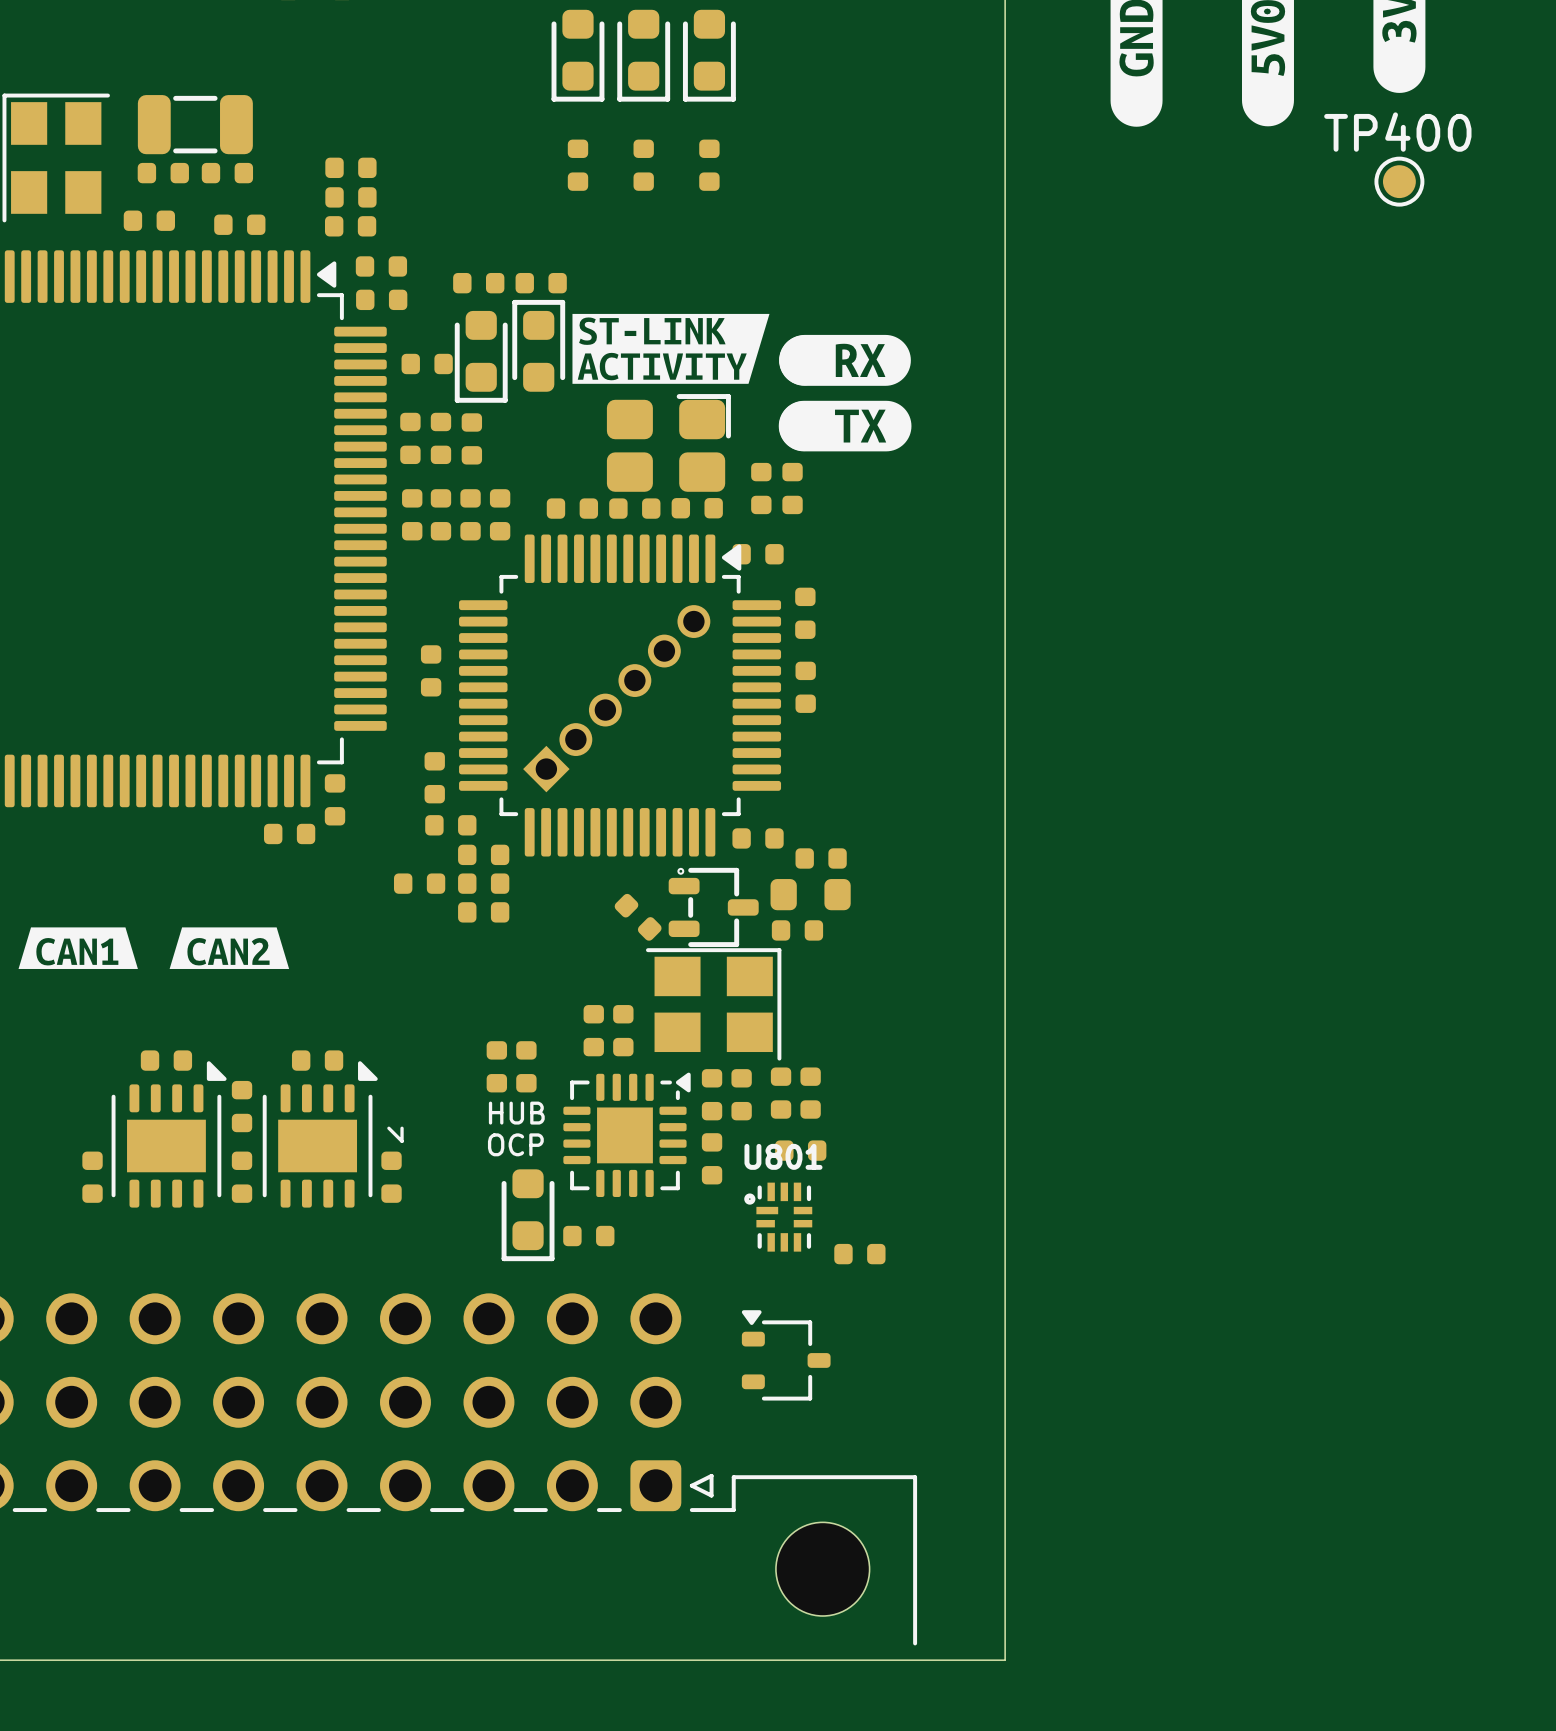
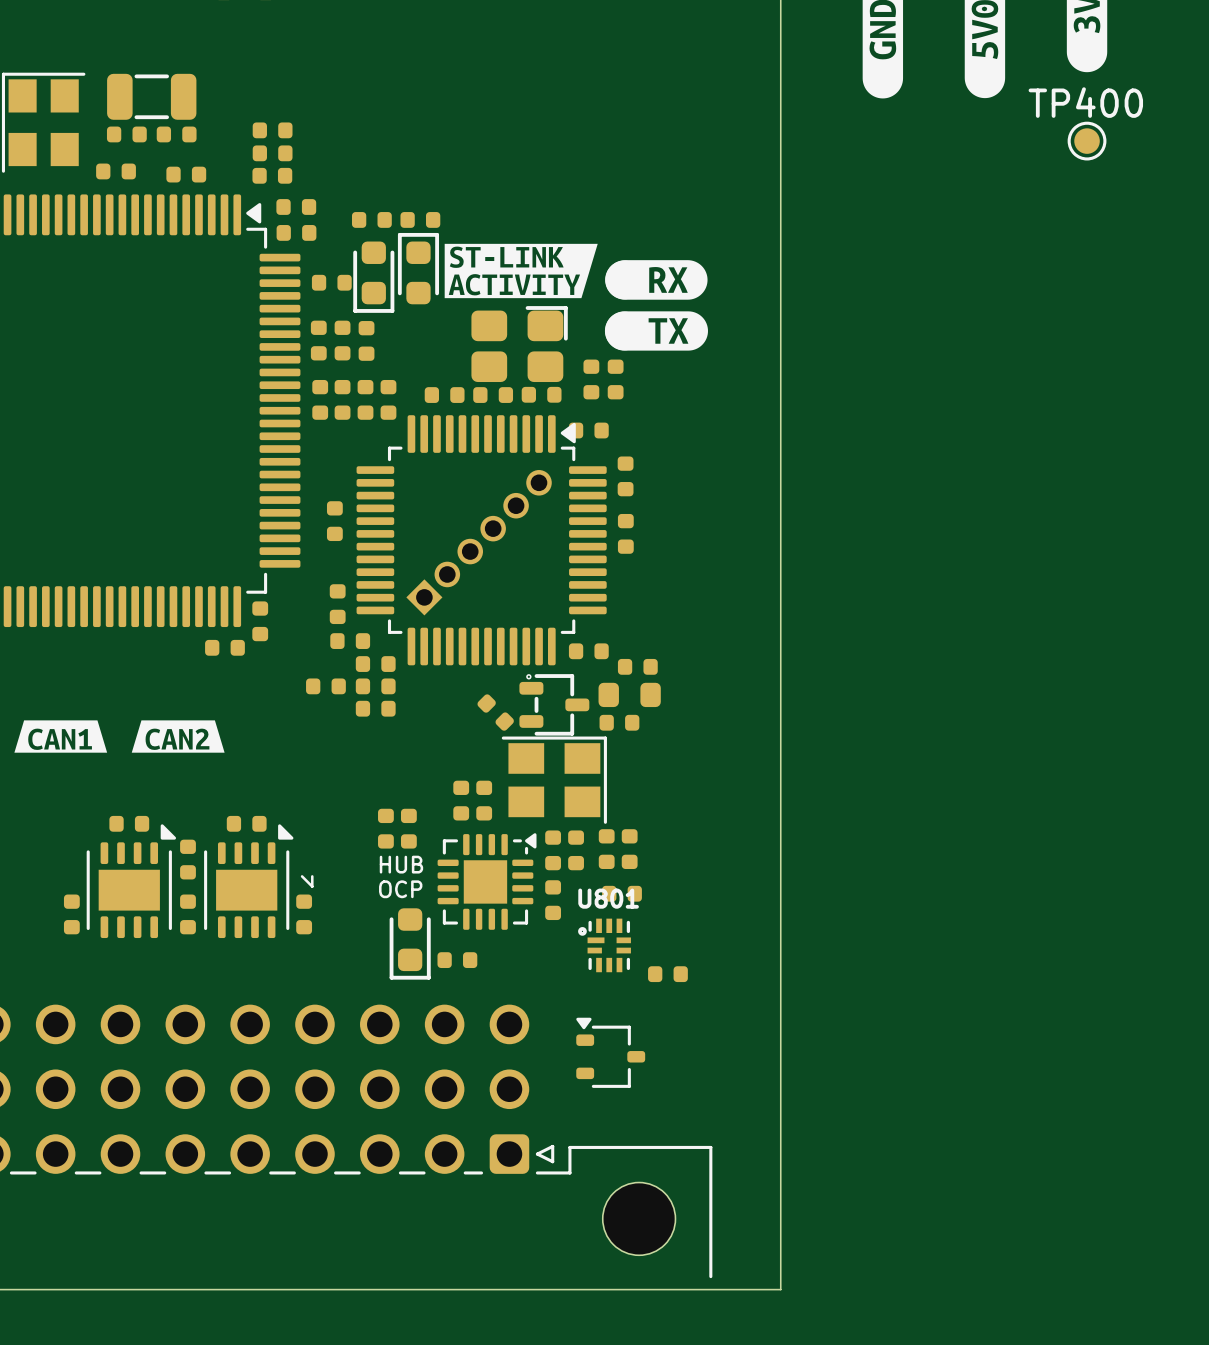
part: (577, 55) -> none
part: (643, 55) -> none
part: (709, 55) -> none
part: (577, 165) -> none
part: (643, 165) -> none
part: (709, 165) -> none

